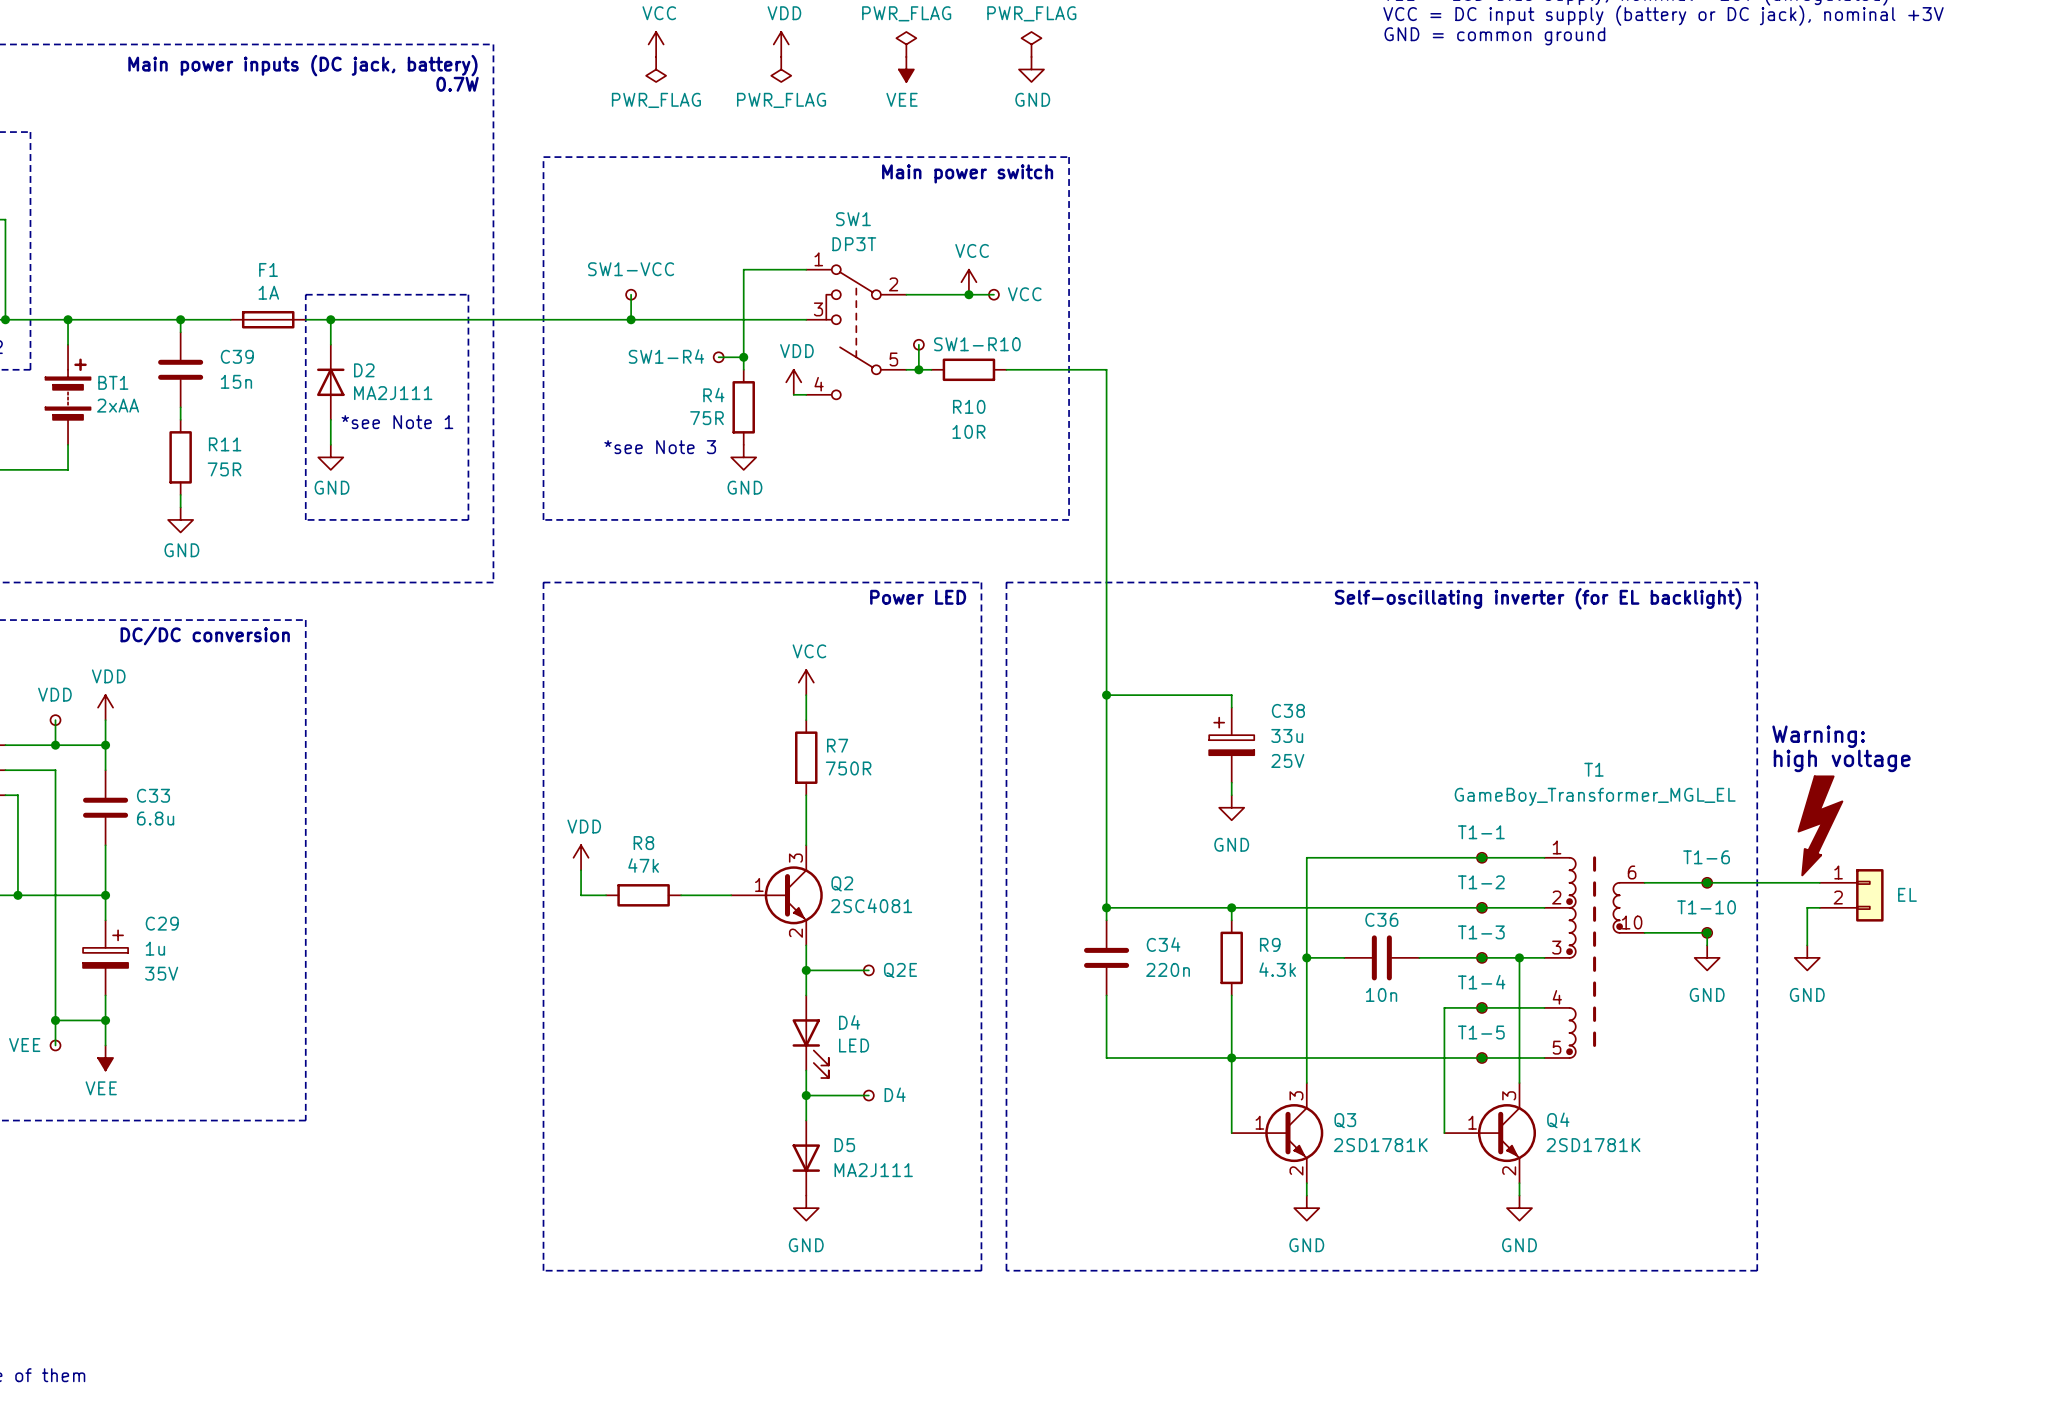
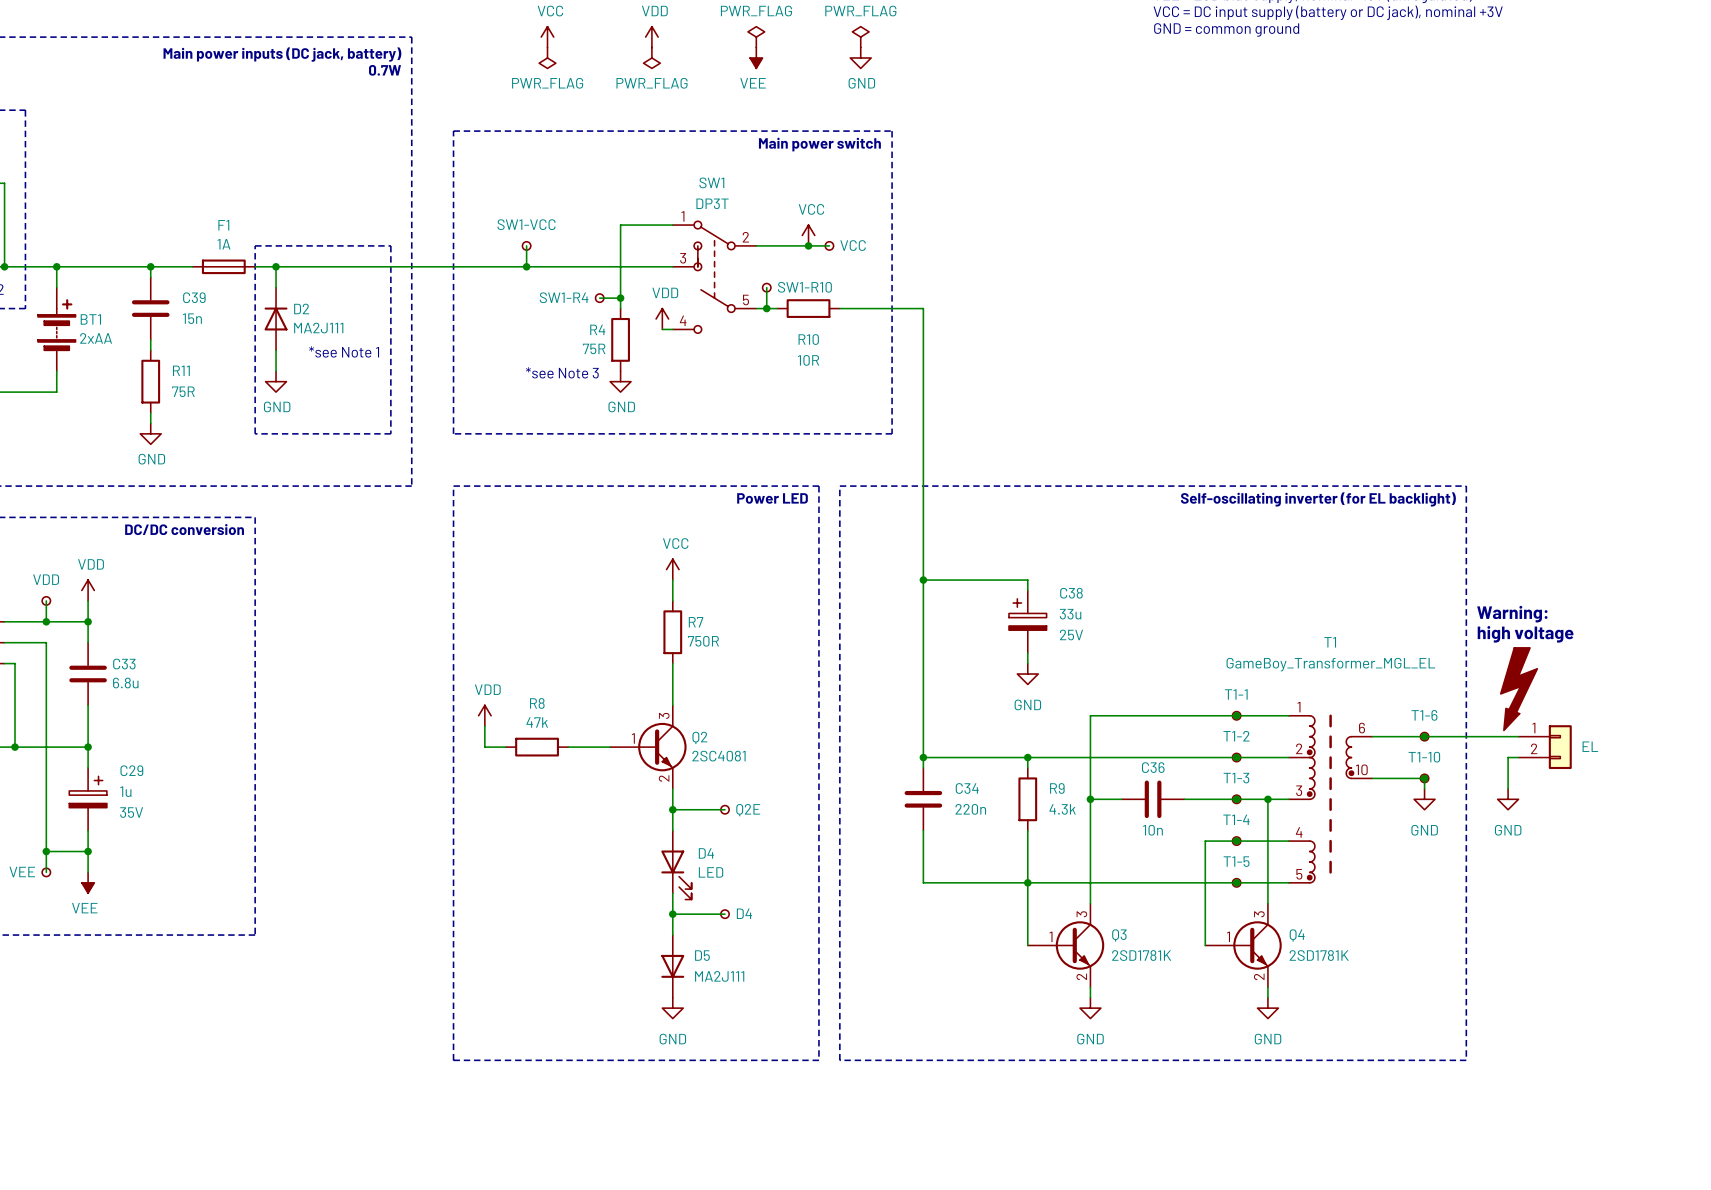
SW1 symbol: [806, 265, 907, 400] -> [672, 221, 757, 334]

